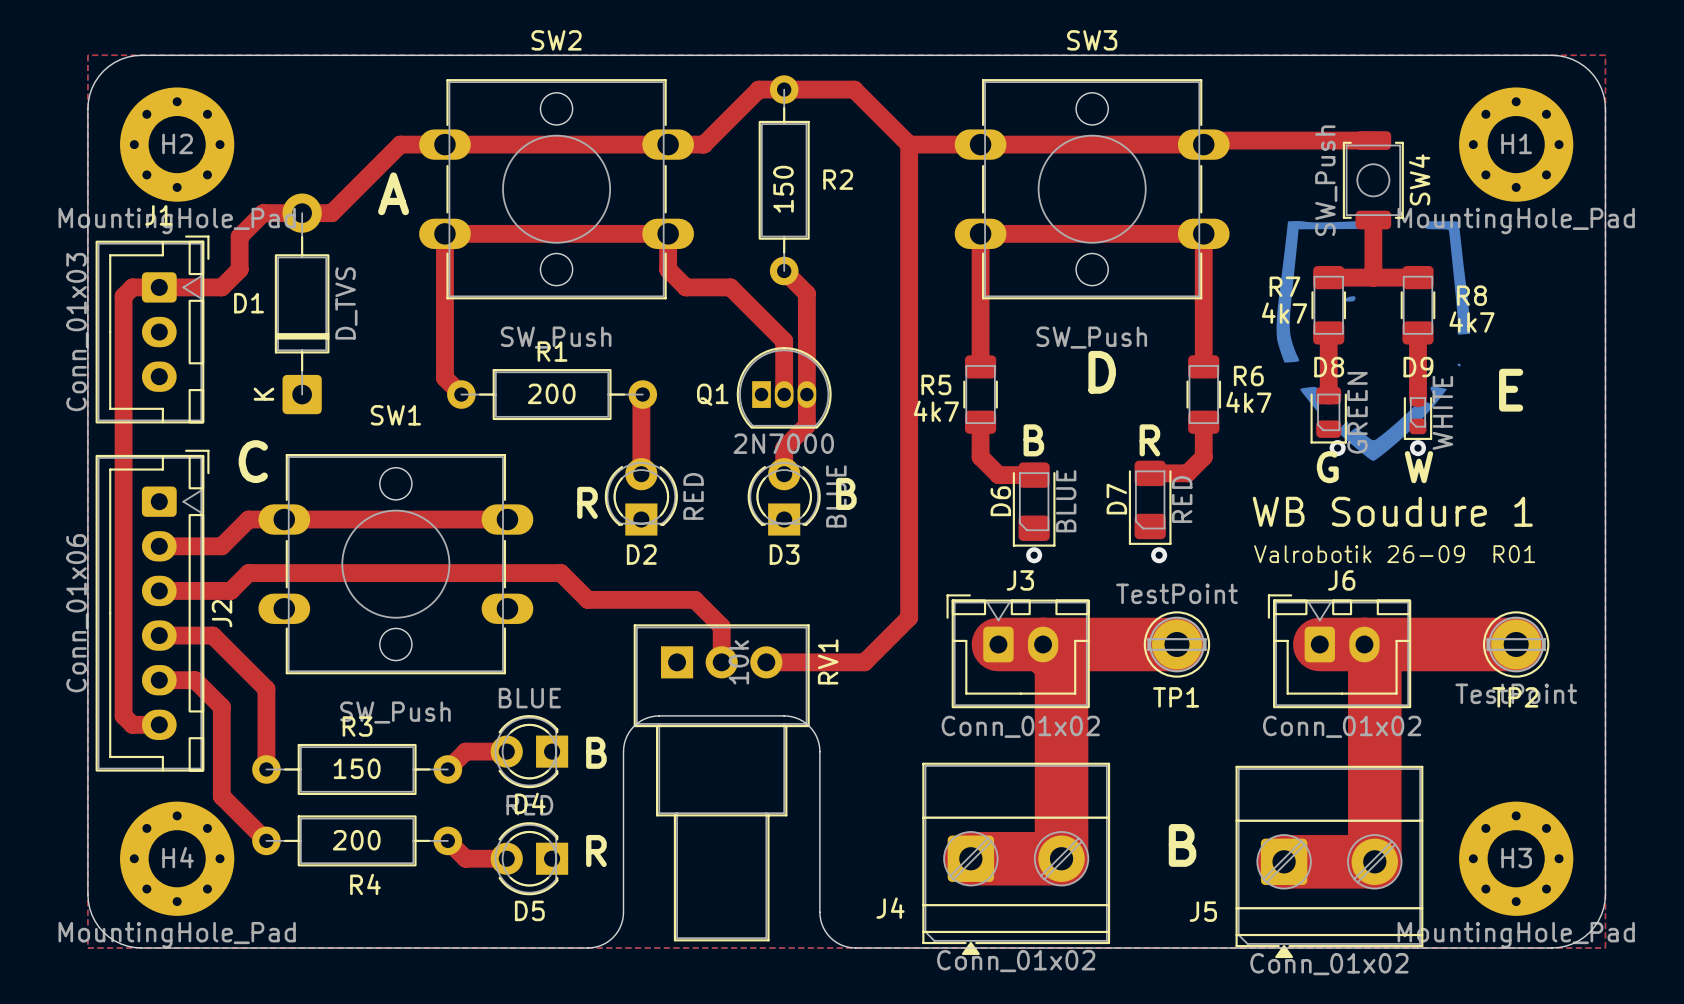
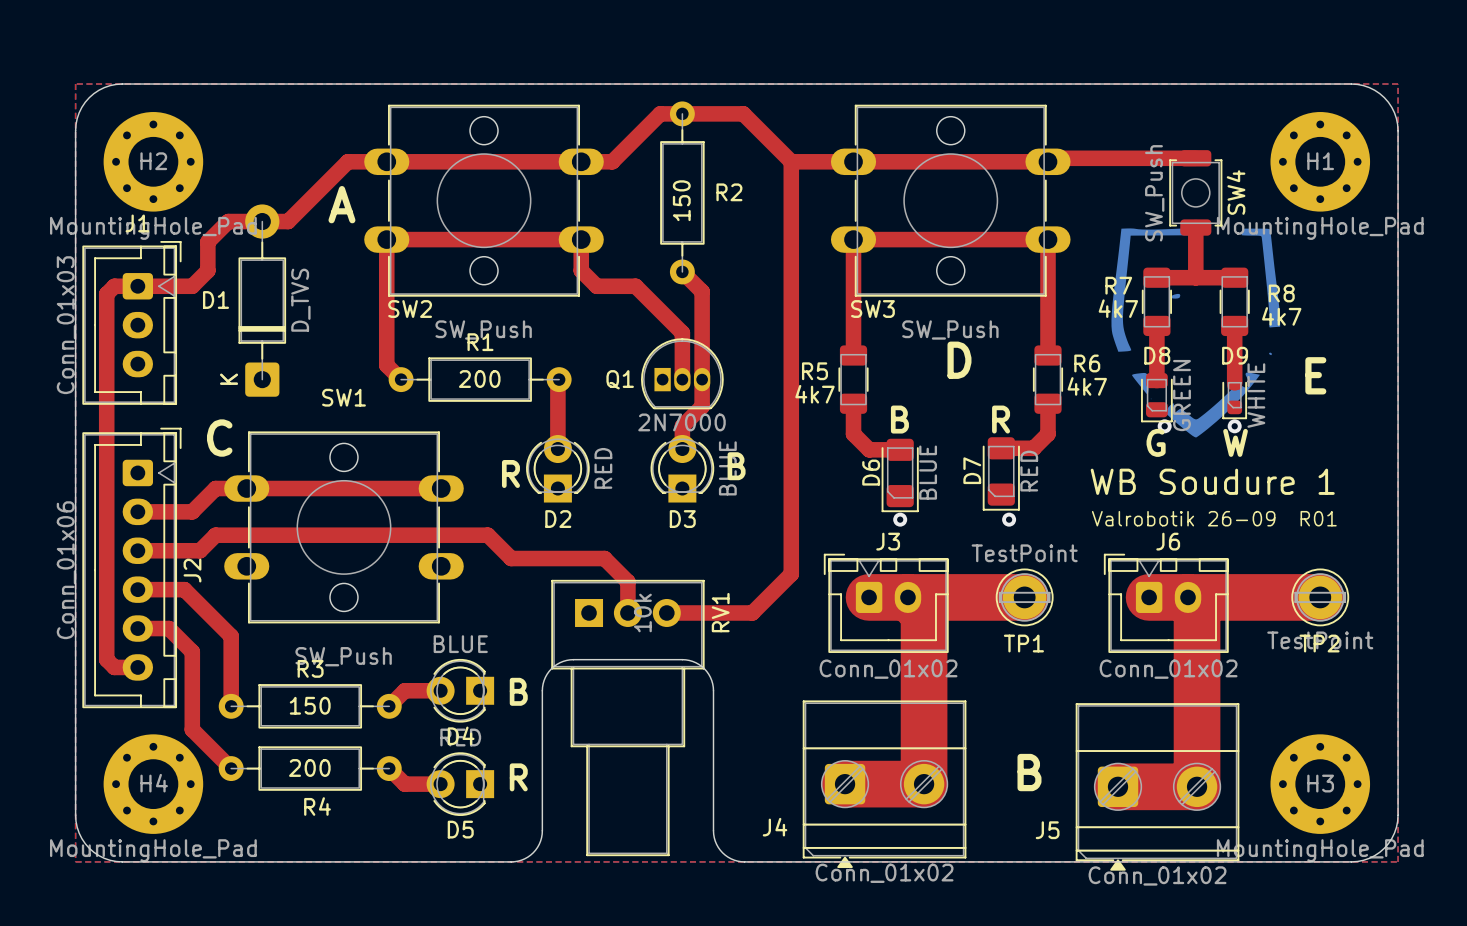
SW2 name position: SW2 (556, 40) -> SW2 (410, 309)
SW3 name position: SW3 (1092, 40) -> SW3 (872, 309)

